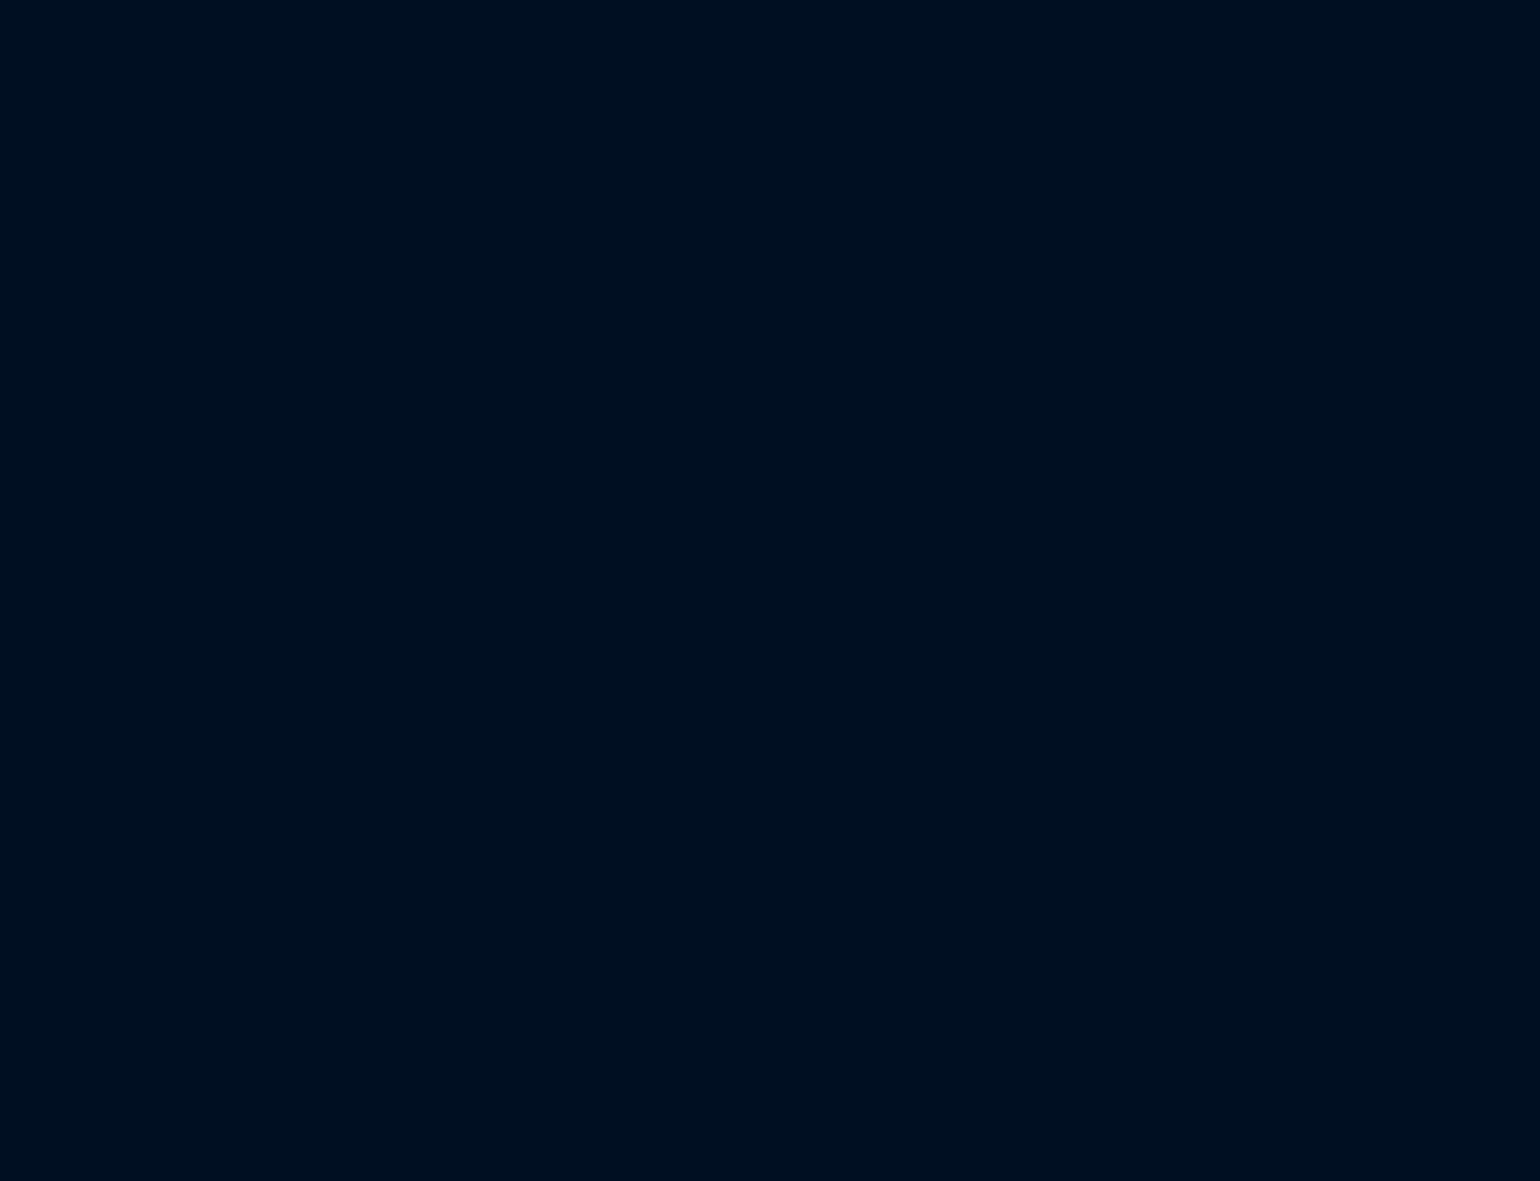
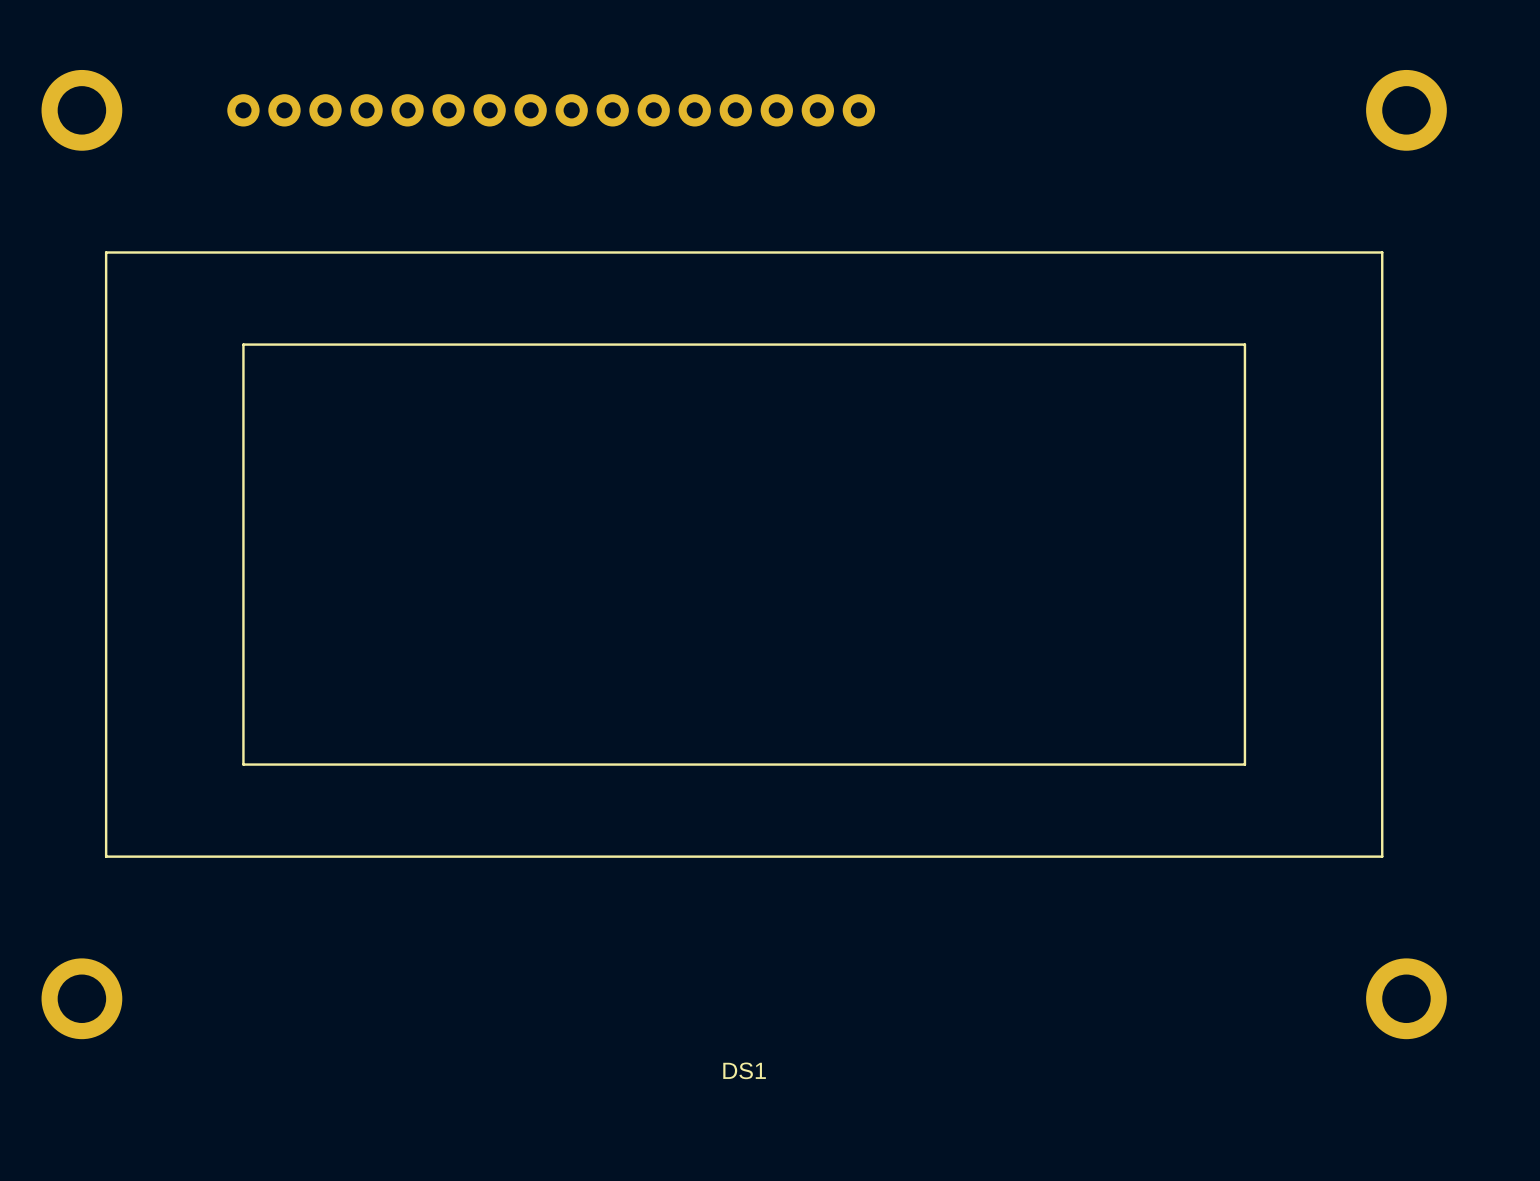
DS1: none -> (744, 554)

